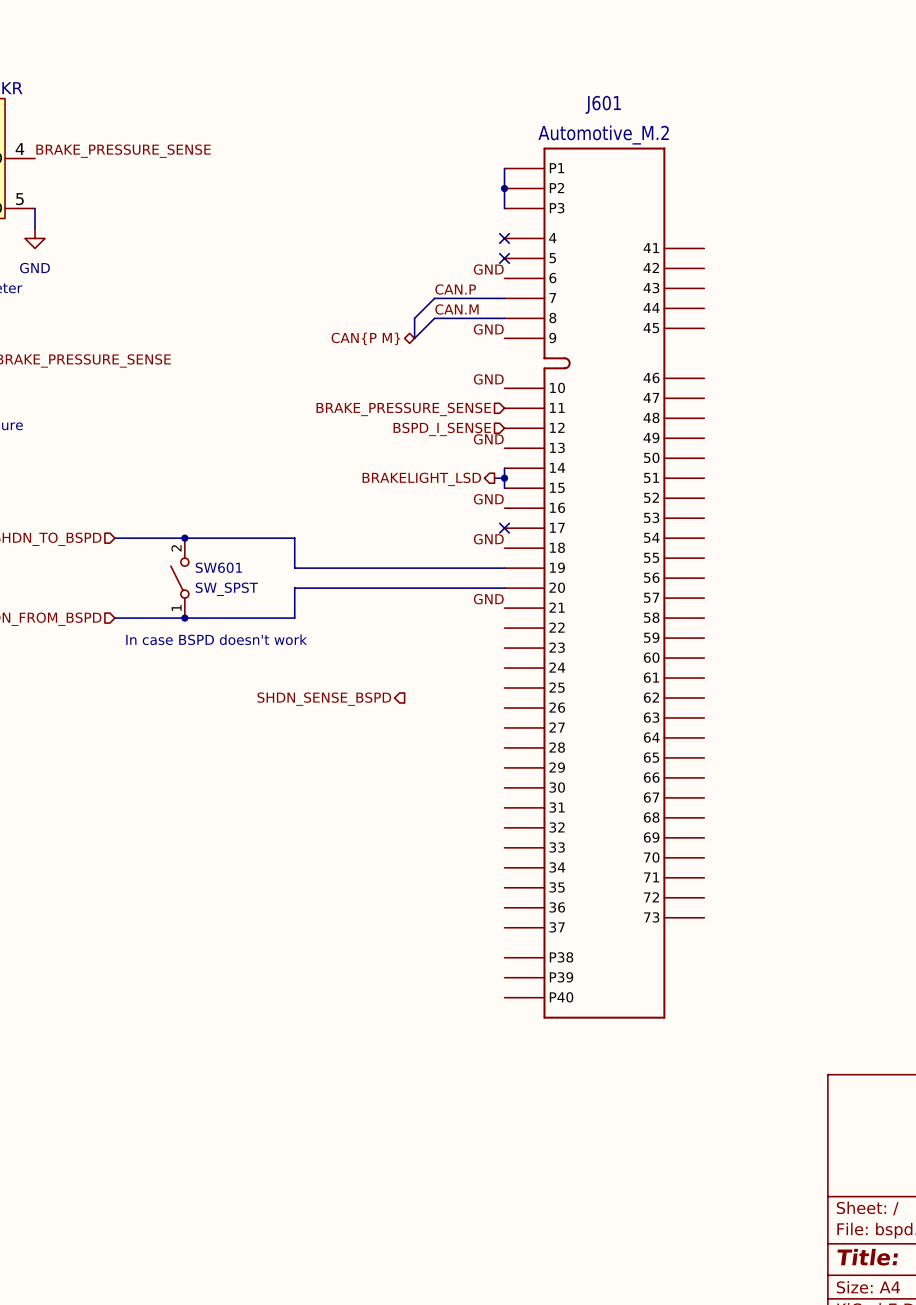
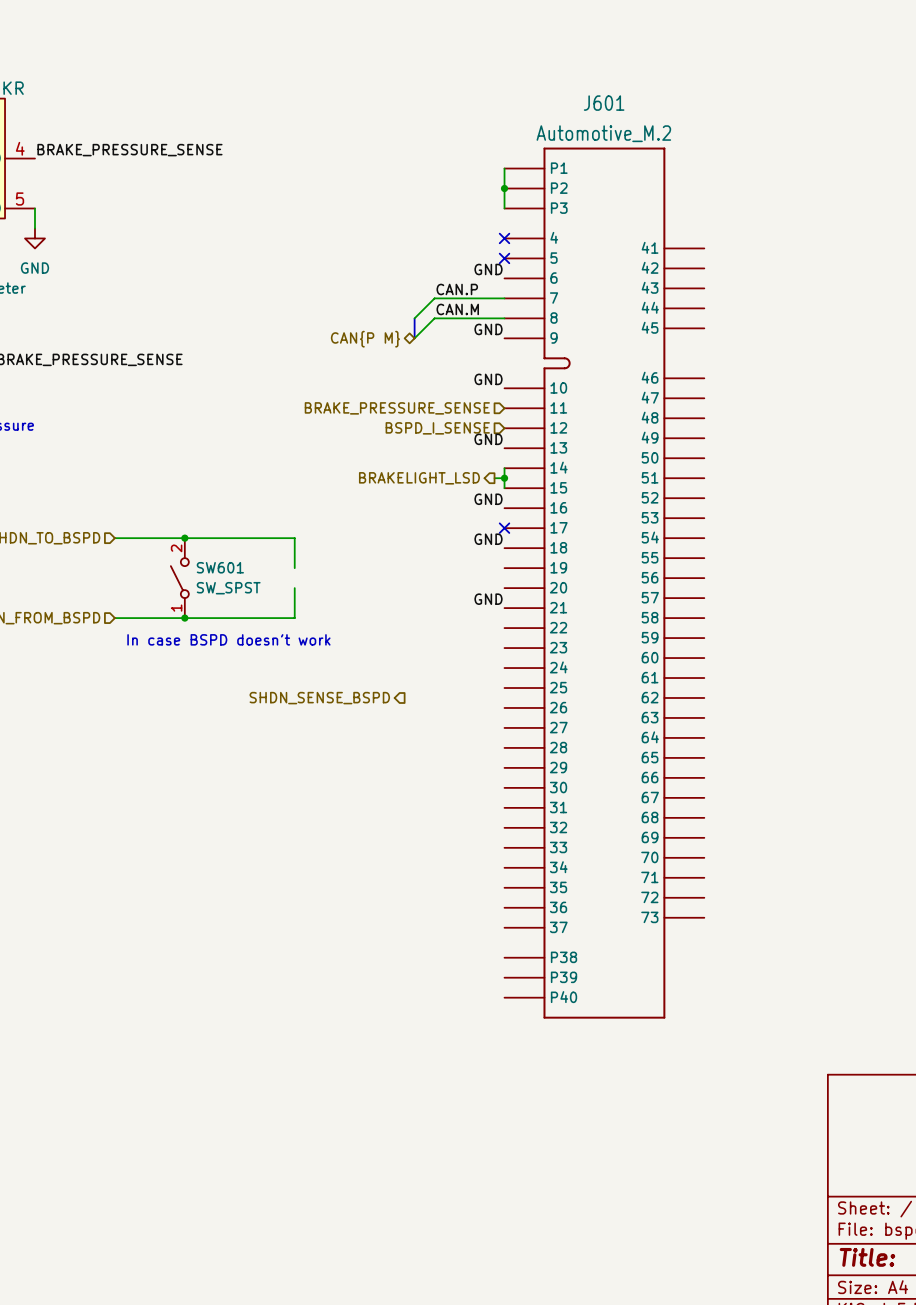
wire: (294, 568) (504, 568) -> none
wire: (294, 588) (504, 588) -> none

